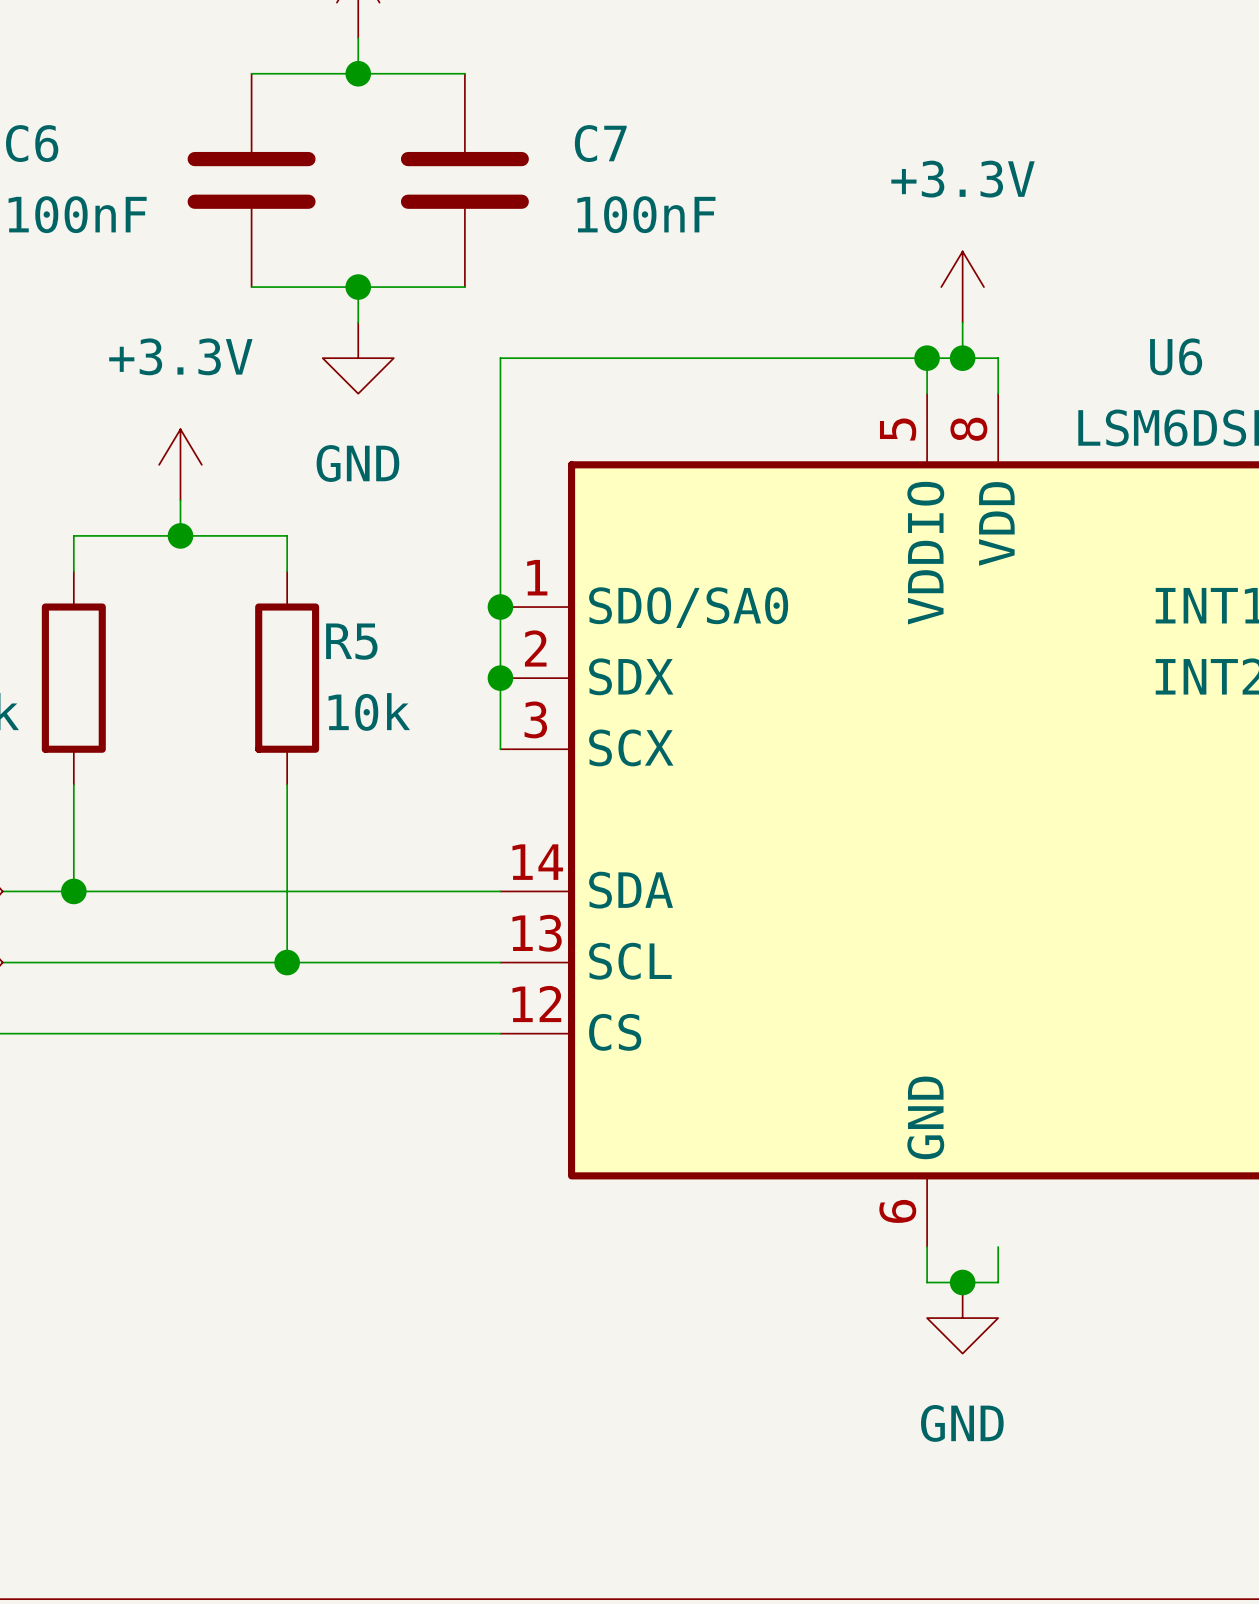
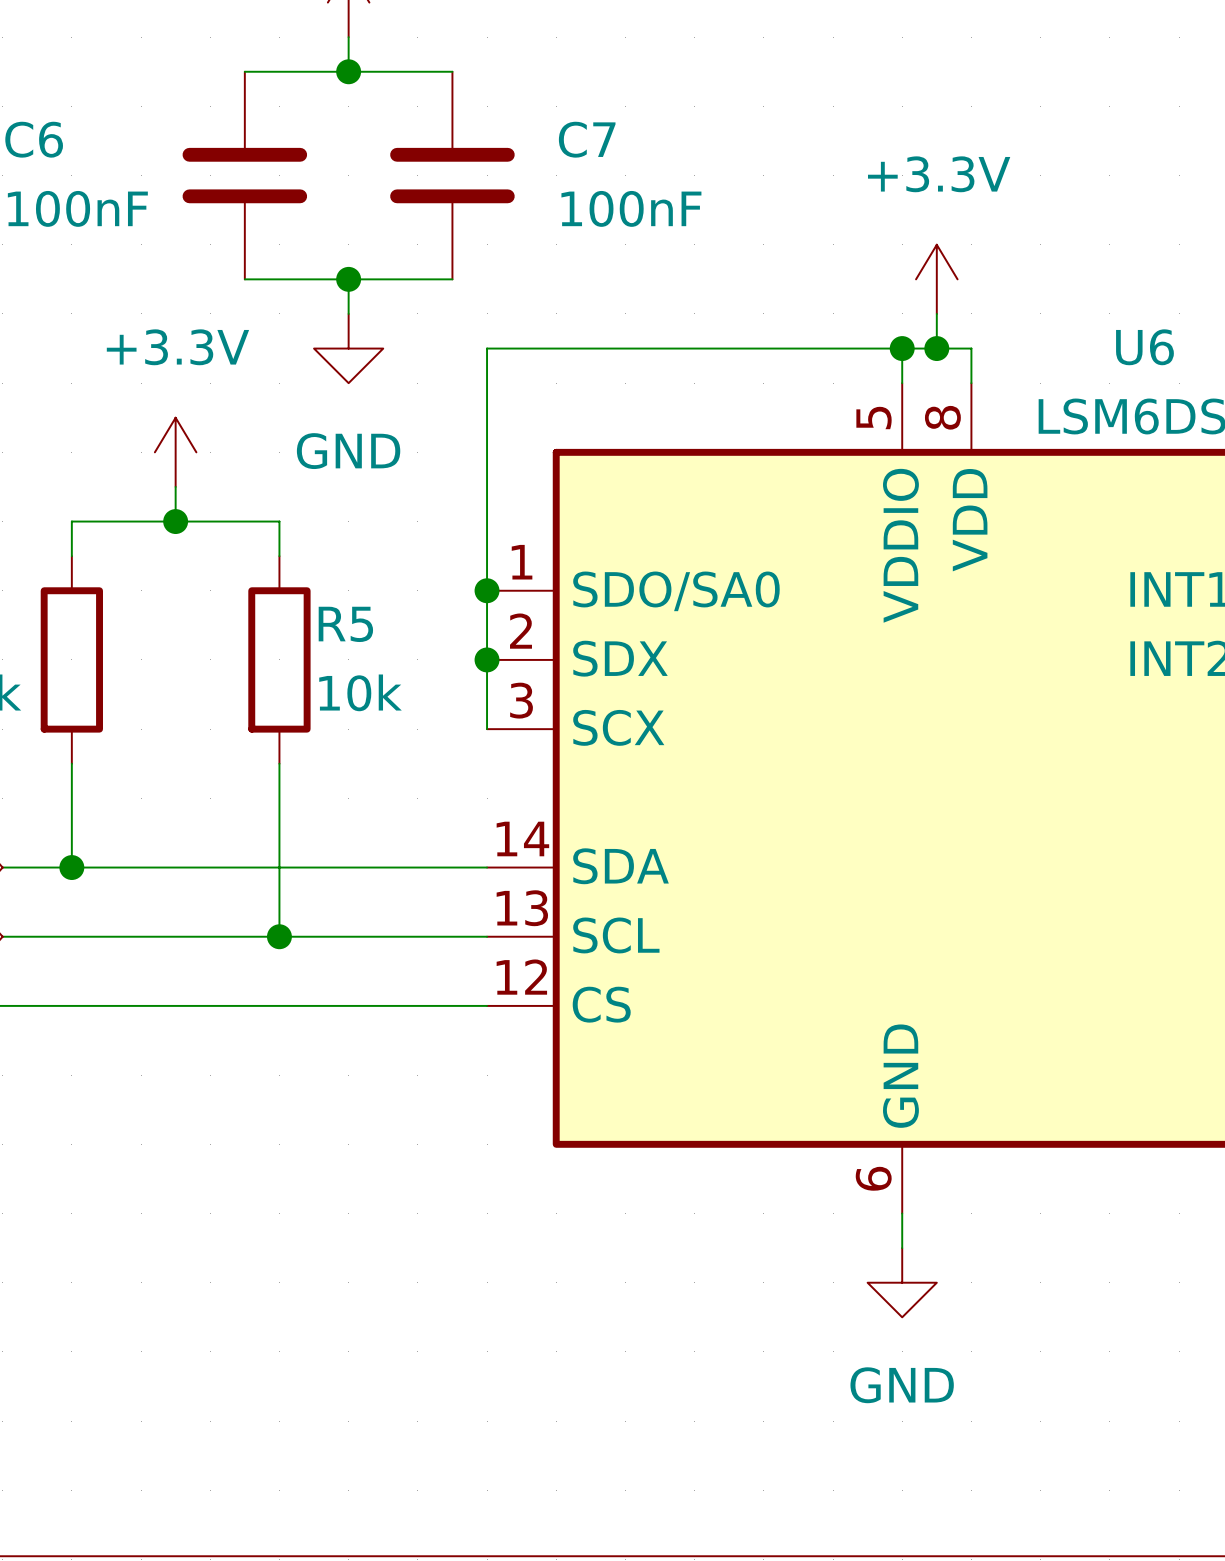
wire: (998, 1246) (998, 1282) (927, 1282) -> none
junction: (962, 1282) -> none
power symbol position: GND (962, 1318) -> GND (902, 1282)

